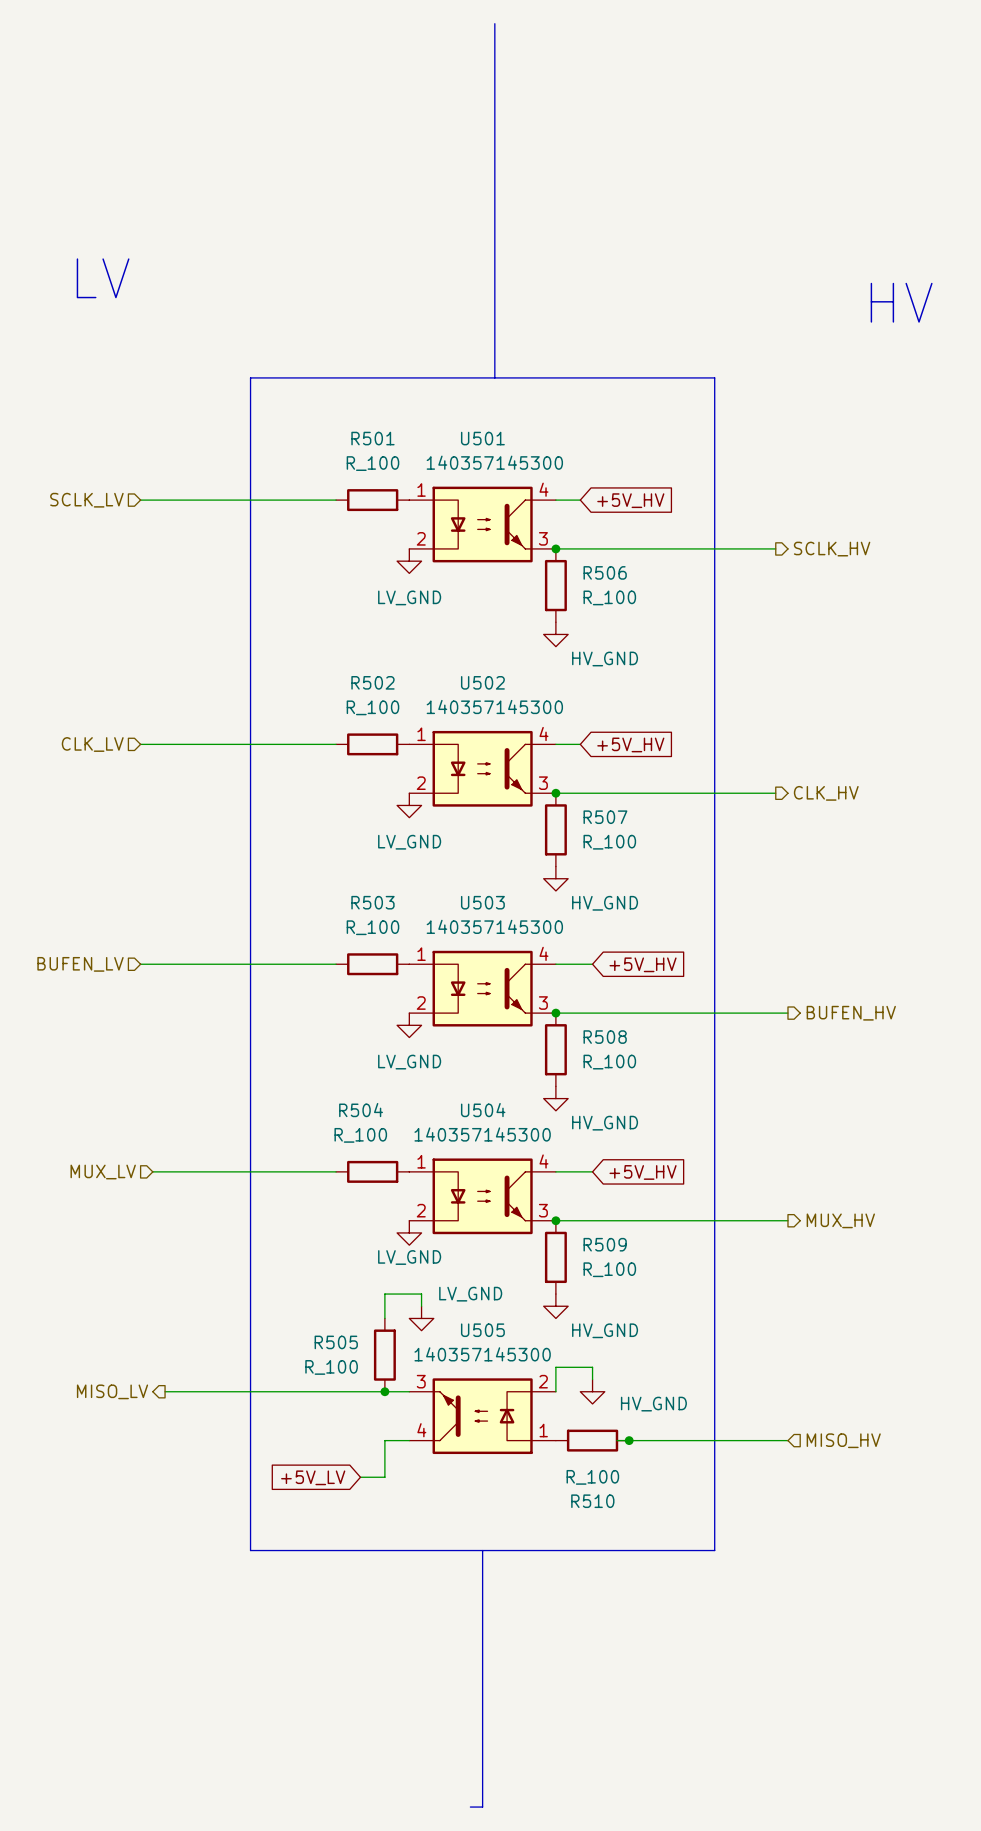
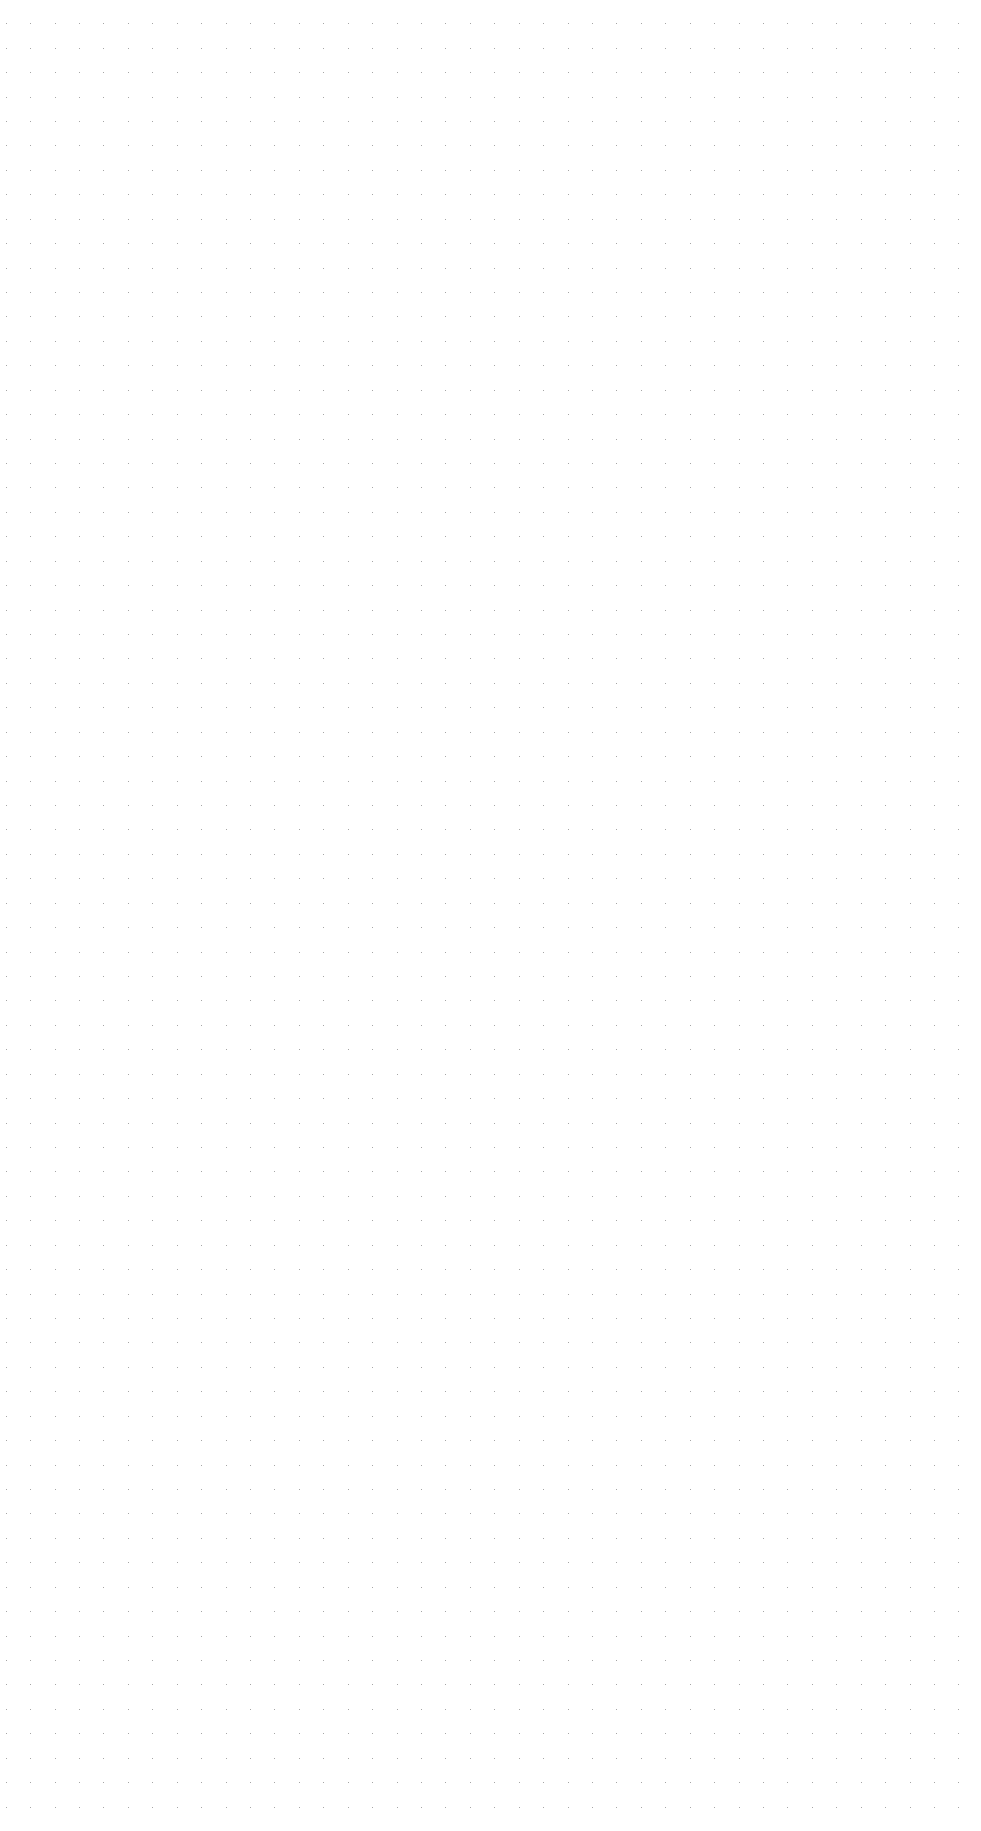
line: (494, 23) (494, 377) -> none
text: LV (103, 278) -> none
text: HV (901, 302) -> none
line: (250, 377) (250, 1550) (714, 1550) (714, 377) (250, 377) -> none
hierarchical label: SCLK_LV (86, 500) -> none
wire: (140, 500) (336, 500) -> none
R501: R_100 (372, 500) -> none
wire: (555, 500) (580, 500) -> none
global label: +5V_HV (630, 500) -> none
U501: 140357145300 (482, 524) -> none
wire: (555, 548) (775, 548) -> none
junction: (555, 548) -> none
hierarchical label: SCLK_HV (832, 549) -> none
power symbol: LV_GND (409, 561) -> none
R506: R_100 (555, 585) -> none
power symbol: HV_GND (555, 634) -> none
hierarchical label: CLK_LV (92, 744) -> none
wire: (140, 744) (336, 744) -> none
R502: R_100 (372, 744) -> none
wire: (555, 744) (580, 744) -> none
global label: +5V_HV (630, 744) -> none
U502: 140357145300 (482, 768) -> none
wire: (555, 793) (775, 793) -> none
junction: (555, 793) -> none
hierarchical label: CLK_HV (826, 793) -> none
power symbol: LV_GND (409, 805) -> none
R507: R_100 (555, 829) -> none
power symbol: HV_GND (555, 878) -> none
hierarchical label: BUFEN_LV (80, 964) -> none
wire: (140, 964) (336, 964) -> none
R503: R_100 (372, 964) -> none
wire: (555, 964) (592, 964) -> none
global label: +5V_HV (643, 964) -> none
U503: 140357145300 (482, 988) -> none
wire: (555, 1013) (787, 1013) -> none
junction: (555, 1013) -> none
hierarchical label: BUFEN_HV (851, 1013) -> none
power symbol: LV_GND (409, 1025) -> none
R508: R_100 (555, 1049) -> none
power symbol: HV_GND (555, 1098) -> none
wire: (152, 1171) (336, 1171) -> none
R504: R_100 (372, 1171) -> none
wire: (555, 1171) (592, 1171) -> none
hierarchical label: MUX_LV (103, 1172) -> none
global label: +5V_HV (643, 1172) -> none
U504: 140357145300 (482, 1196) -> none
wire: (555, 1220) (787, 1220) -> none
junction: (555, 1220) -> none
hierarchical label: MUX_HV (840, 1220) -> none
power symbol: LV_GND (409, 1232) -> none
R509: R_100 (555, 1257) -> none
wire: (421, 1306) (421, 1294) (384, 1294) (384, 1318) -> none
power symbol: HV_GND (555, 1306) -> none
power symbol: LV_GND (421, 1318) -> none
R505: R_100 (384, 1355) -> none
wire: (592, 1379) (592, 1367) (555, 1367) (555, 1391) -> none
hierarchical label: MISO_LV (112, 1391) -> none
wire: (165, 1391) (409, 1391) -> none
junction: (384, 1391) -> none
power symbol: HV_GND (592, 1391) -> none
U505: 140357145300 (482, 1416) -> none
wire: (409, 1440) (384, 1440) (384, 1477) (360, 1477) -> none
R510: R_100 (592, 1440) -> none
wire: (616, 1440) (787, 1440) -> none
junction: (629, 1440) -> none
hierarchical label: MISO_HV (843, 1440) -> none
global label: +5V_LV (313, 1477) -> none
line: (482, 1550) (482, 1807) (470, 1807) -> none

